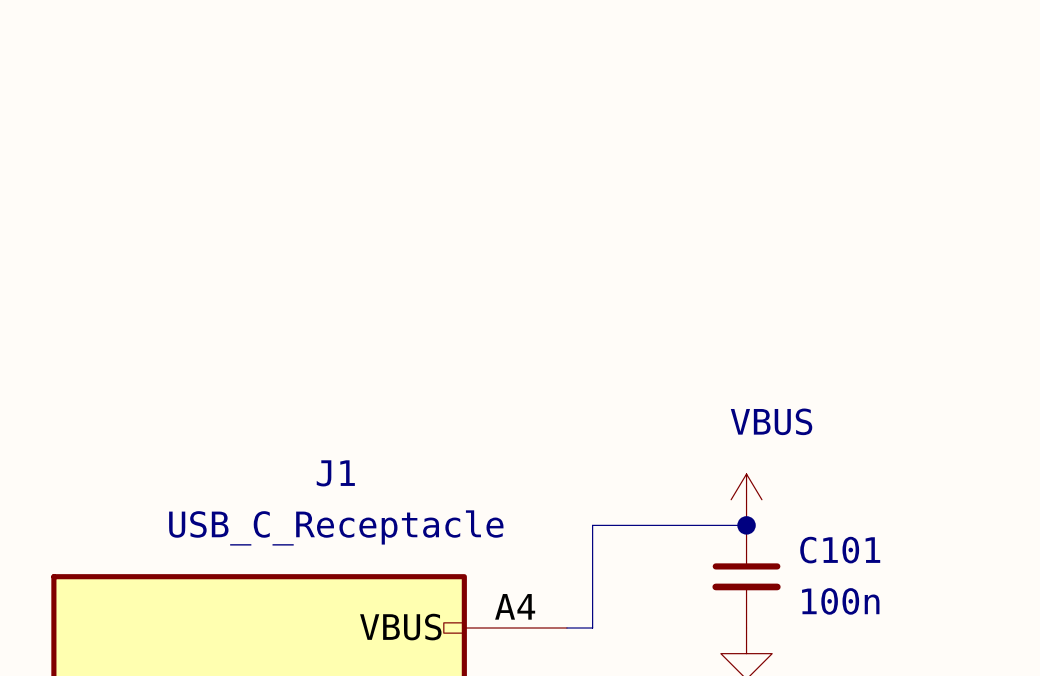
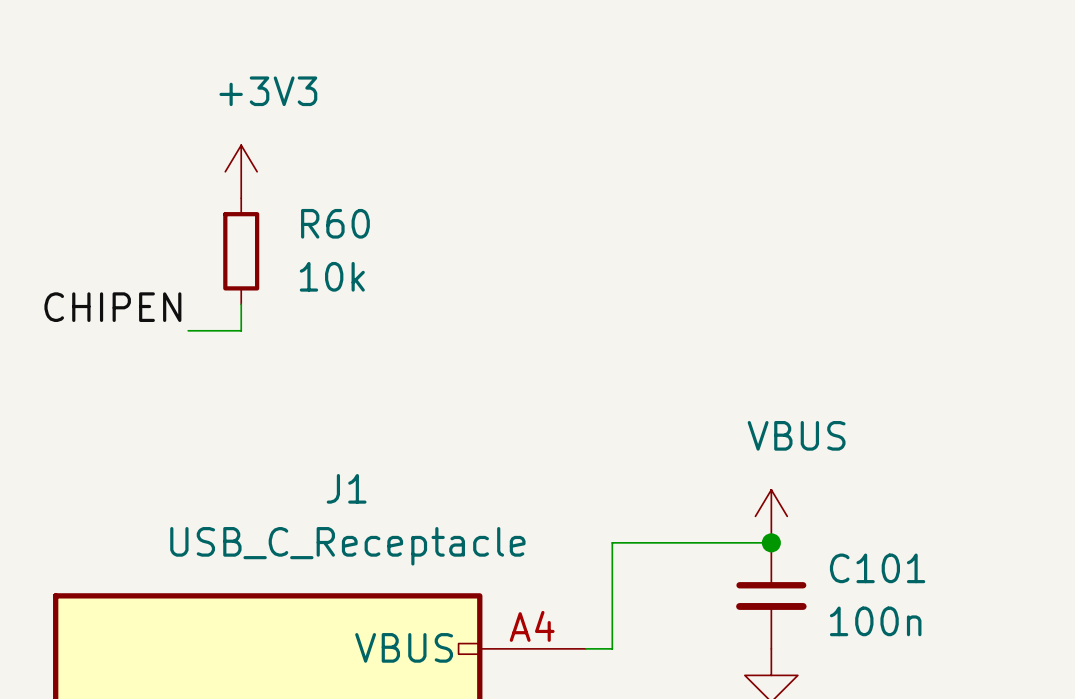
power symbol: none -> +3V3 (241, 171)
R60: none -> 10k (241, 251)
wire: none -> (241, 304) (241, 330) (188, 330)
label: none -> CHIPEN (112, 307)

